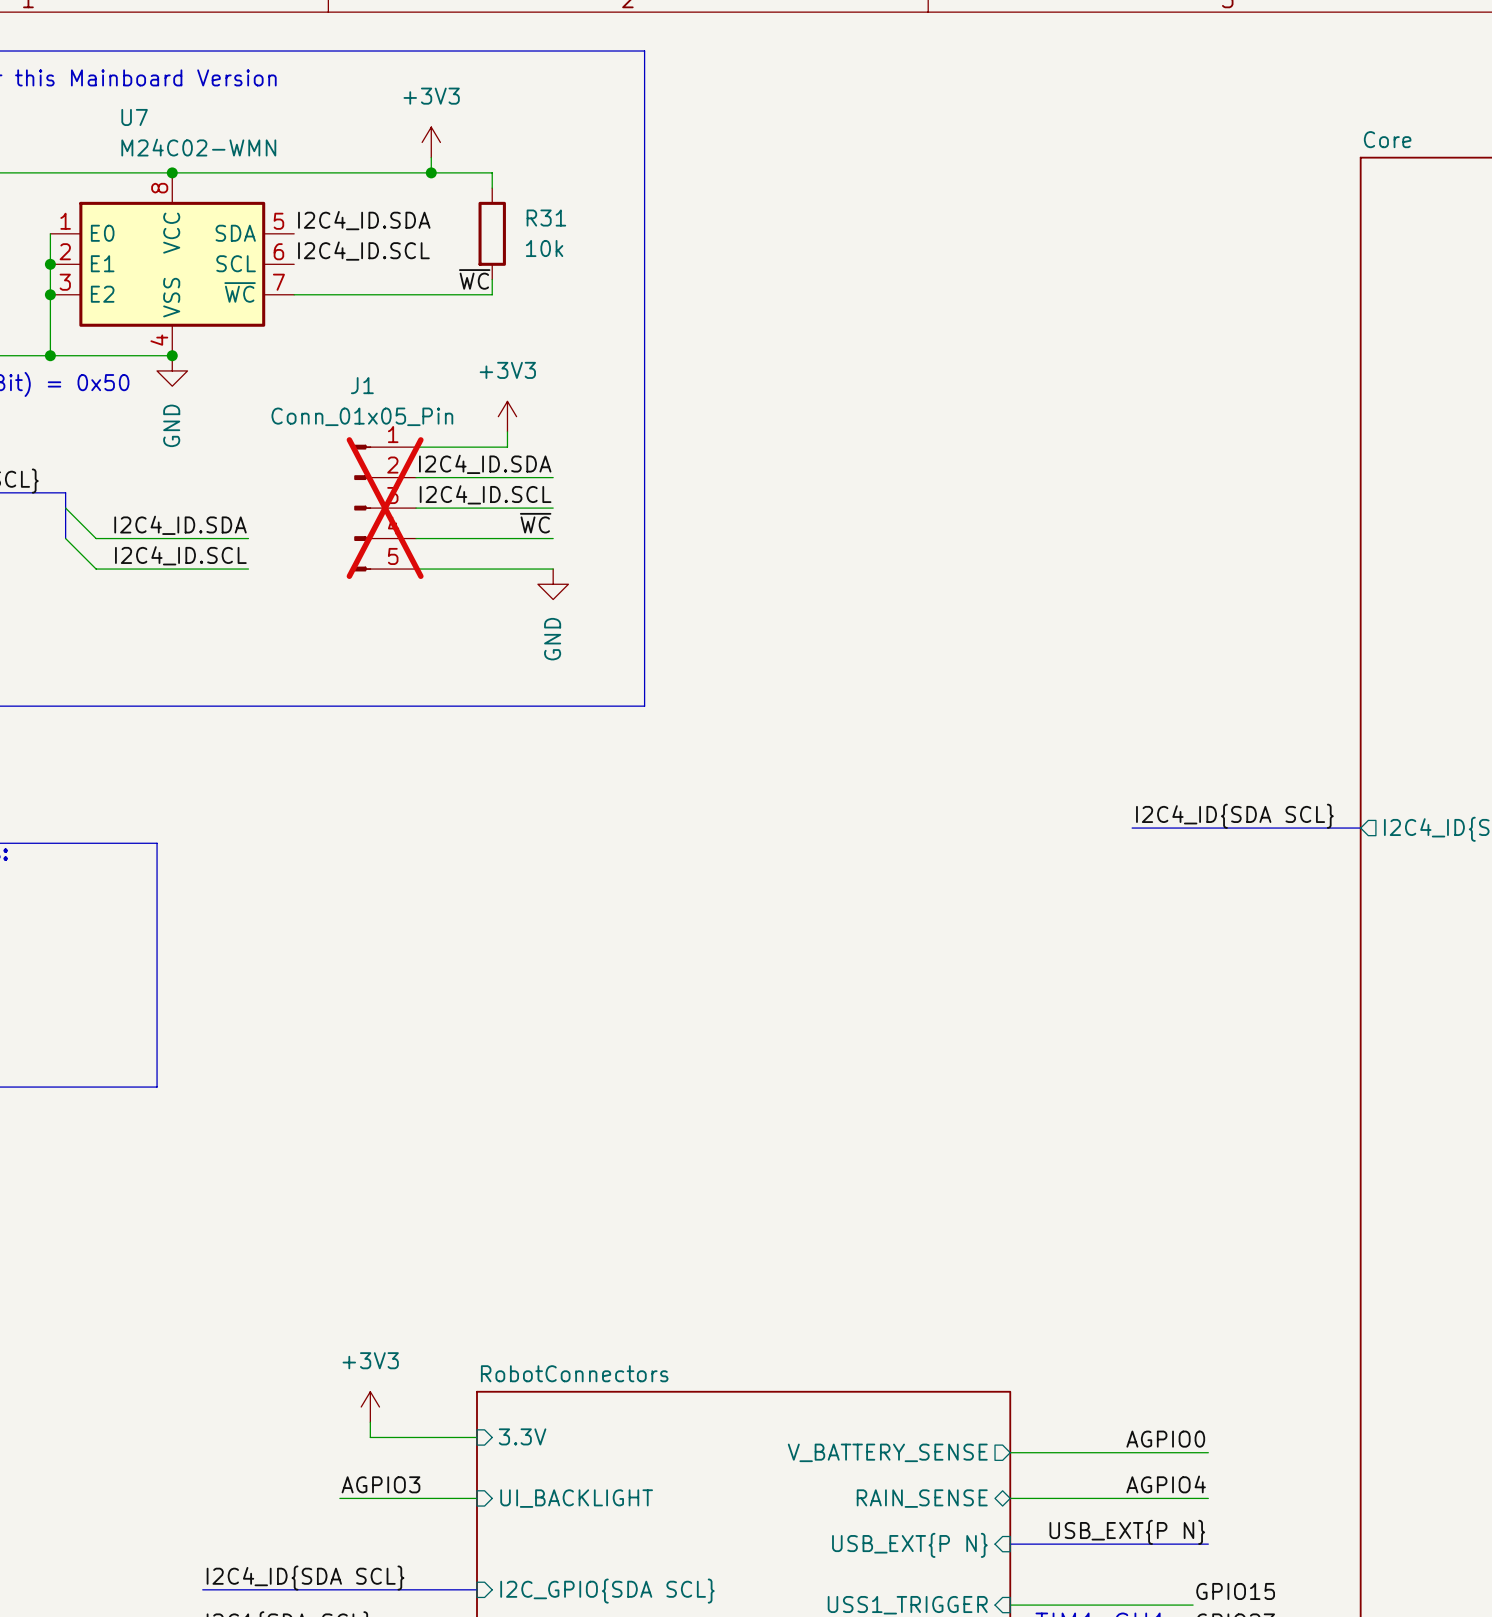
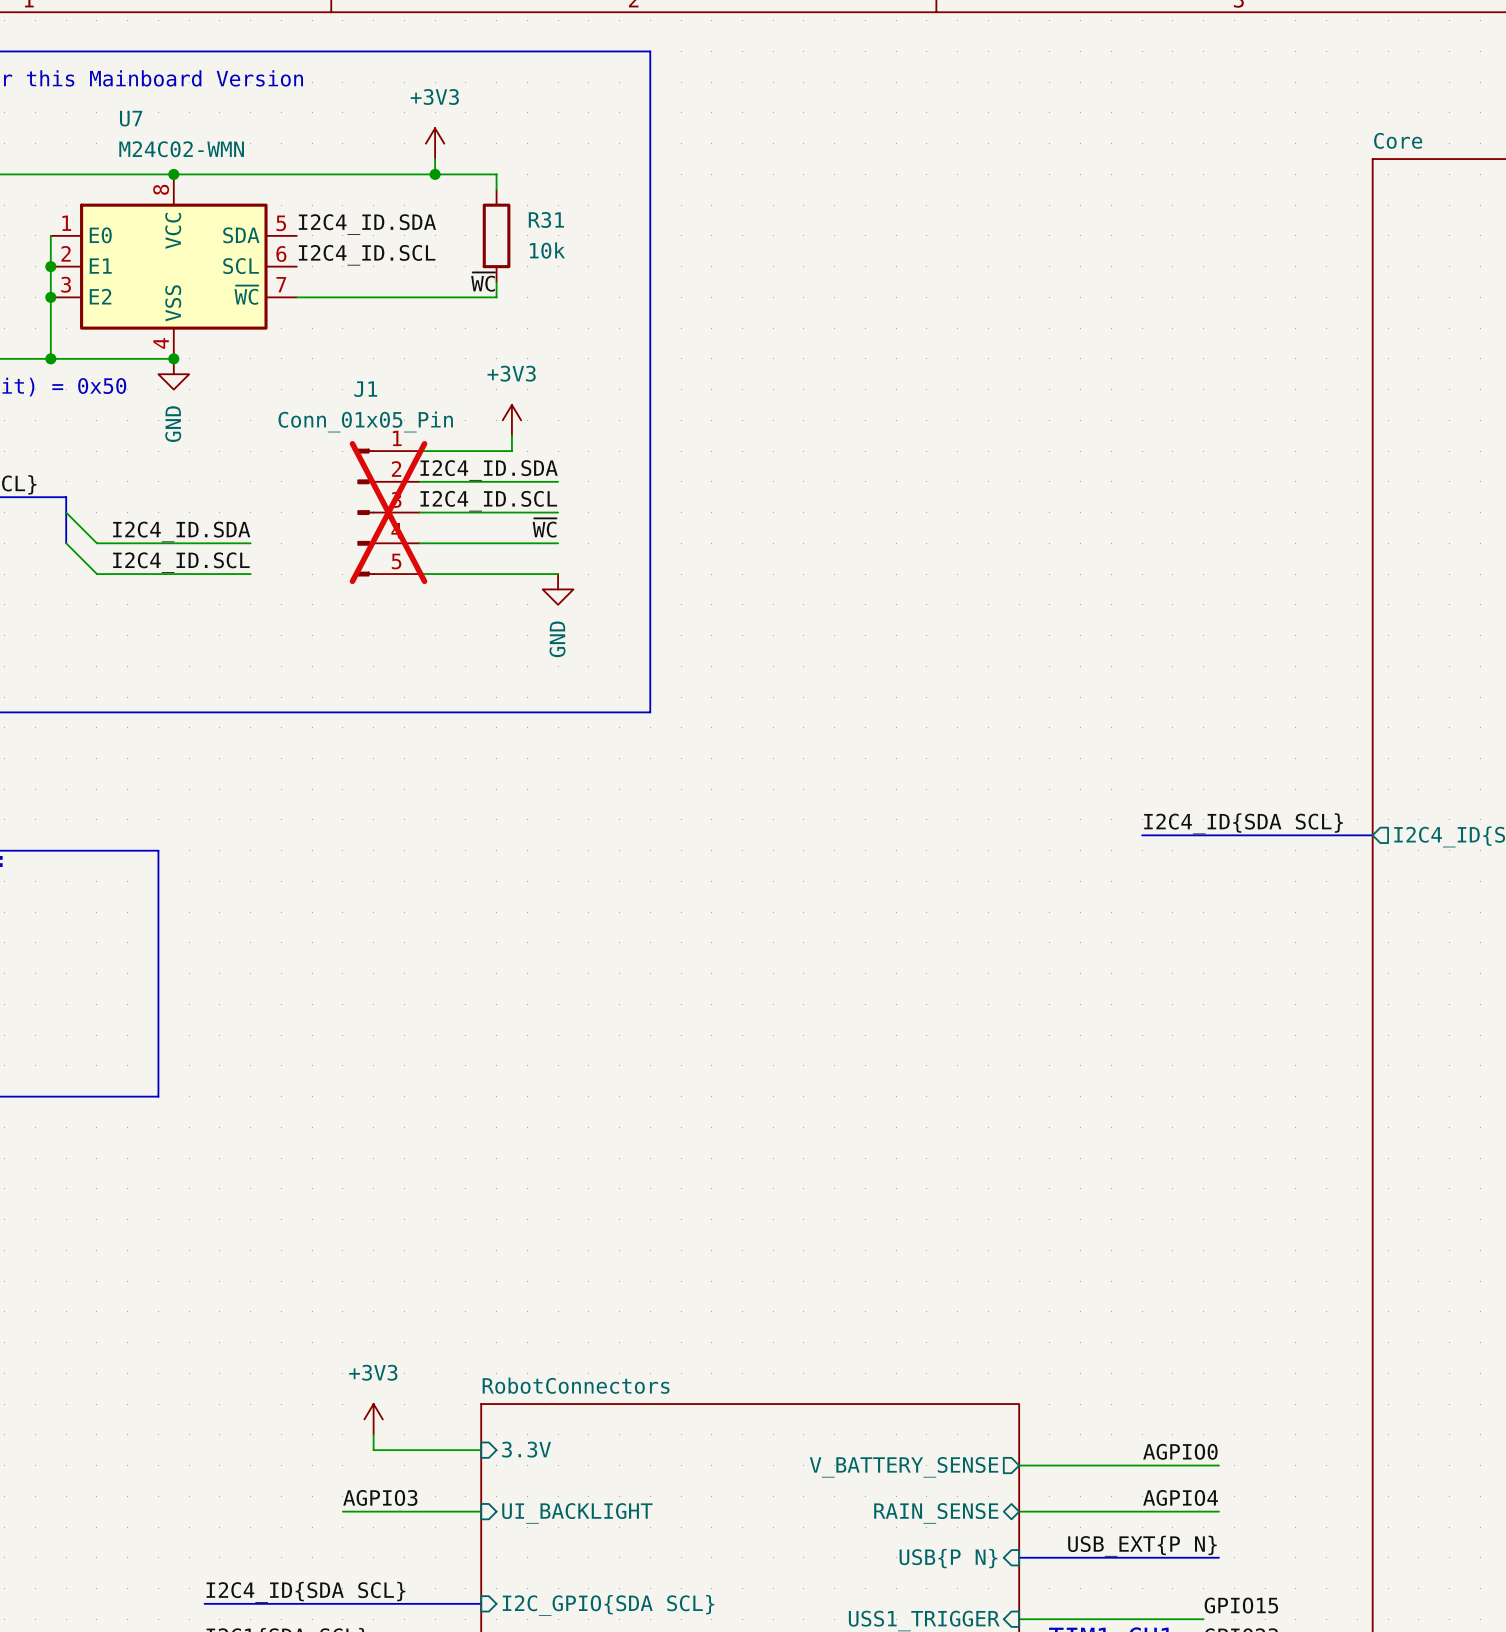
sheet pin: USB_EXT{P N} (909, 1545) -> USB{P N} (948, 1558)

